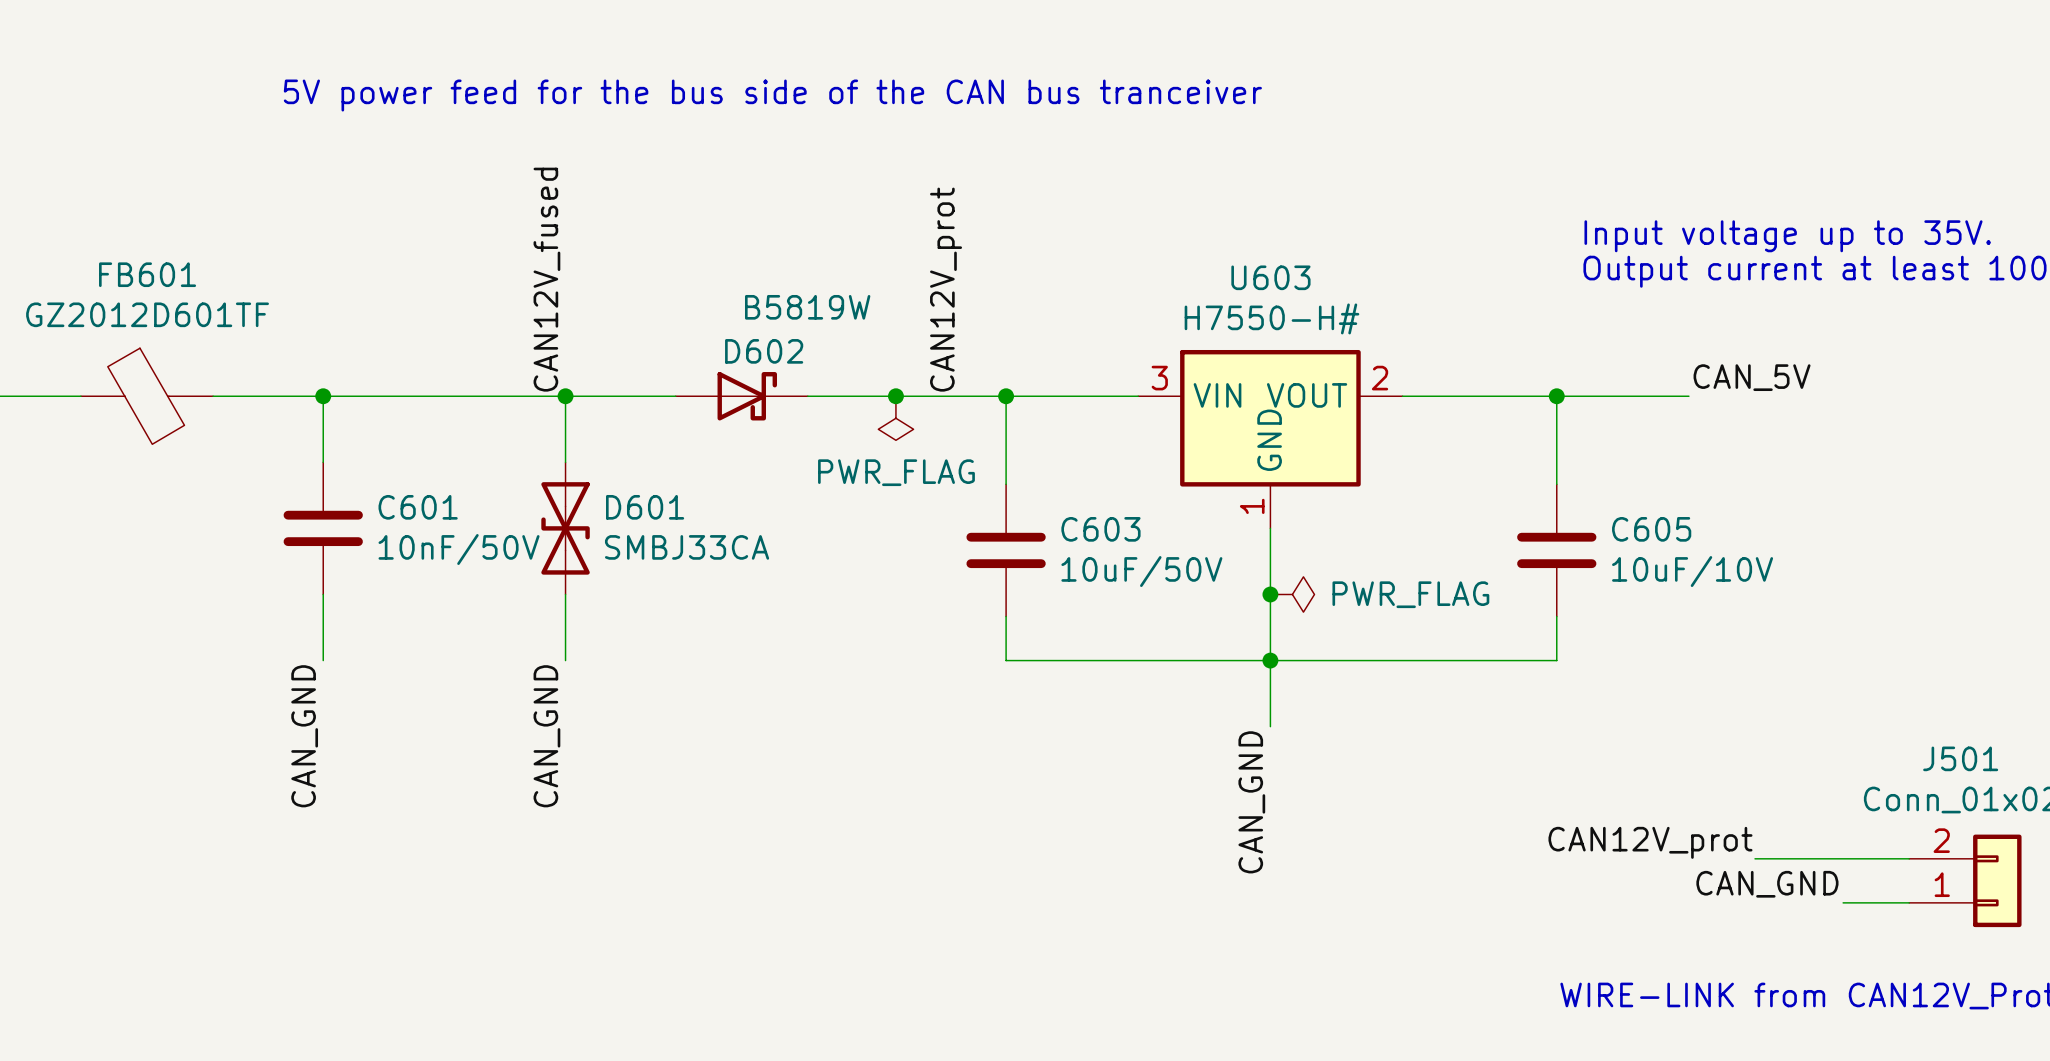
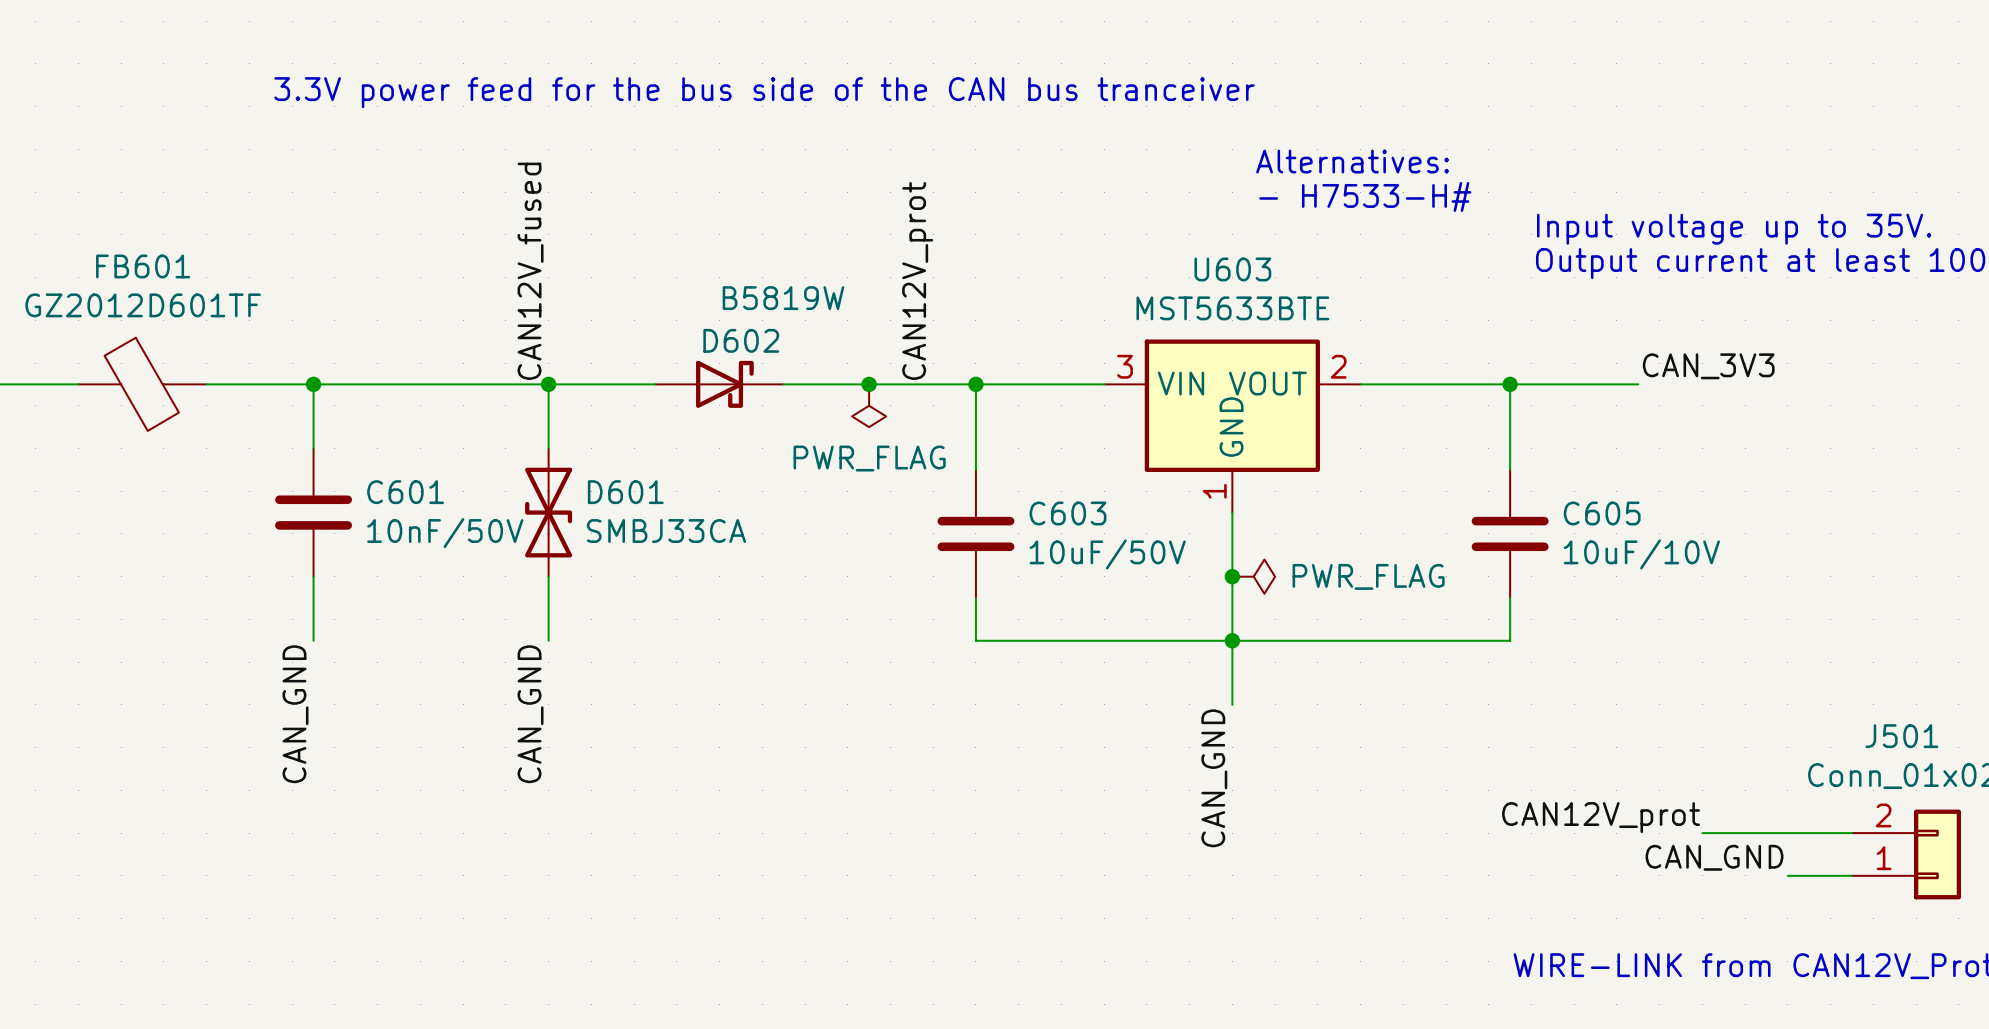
text: 5V power feed for the bus side of the CAN bus tranceiver (772, 95) -> 3.3V power feed for the bus side of the CAN bus tranceiver (764, 92)
text: none -> Alternatives: (1352, 161)
text: none -> - H7533-H# (1365, 196)
U603 value: H7550-H# (1271, 318) -> MST5633BTE (1232, 308)
label: CAN_5V (1752, 377) -> CAN_3V3 (1708, 366)

